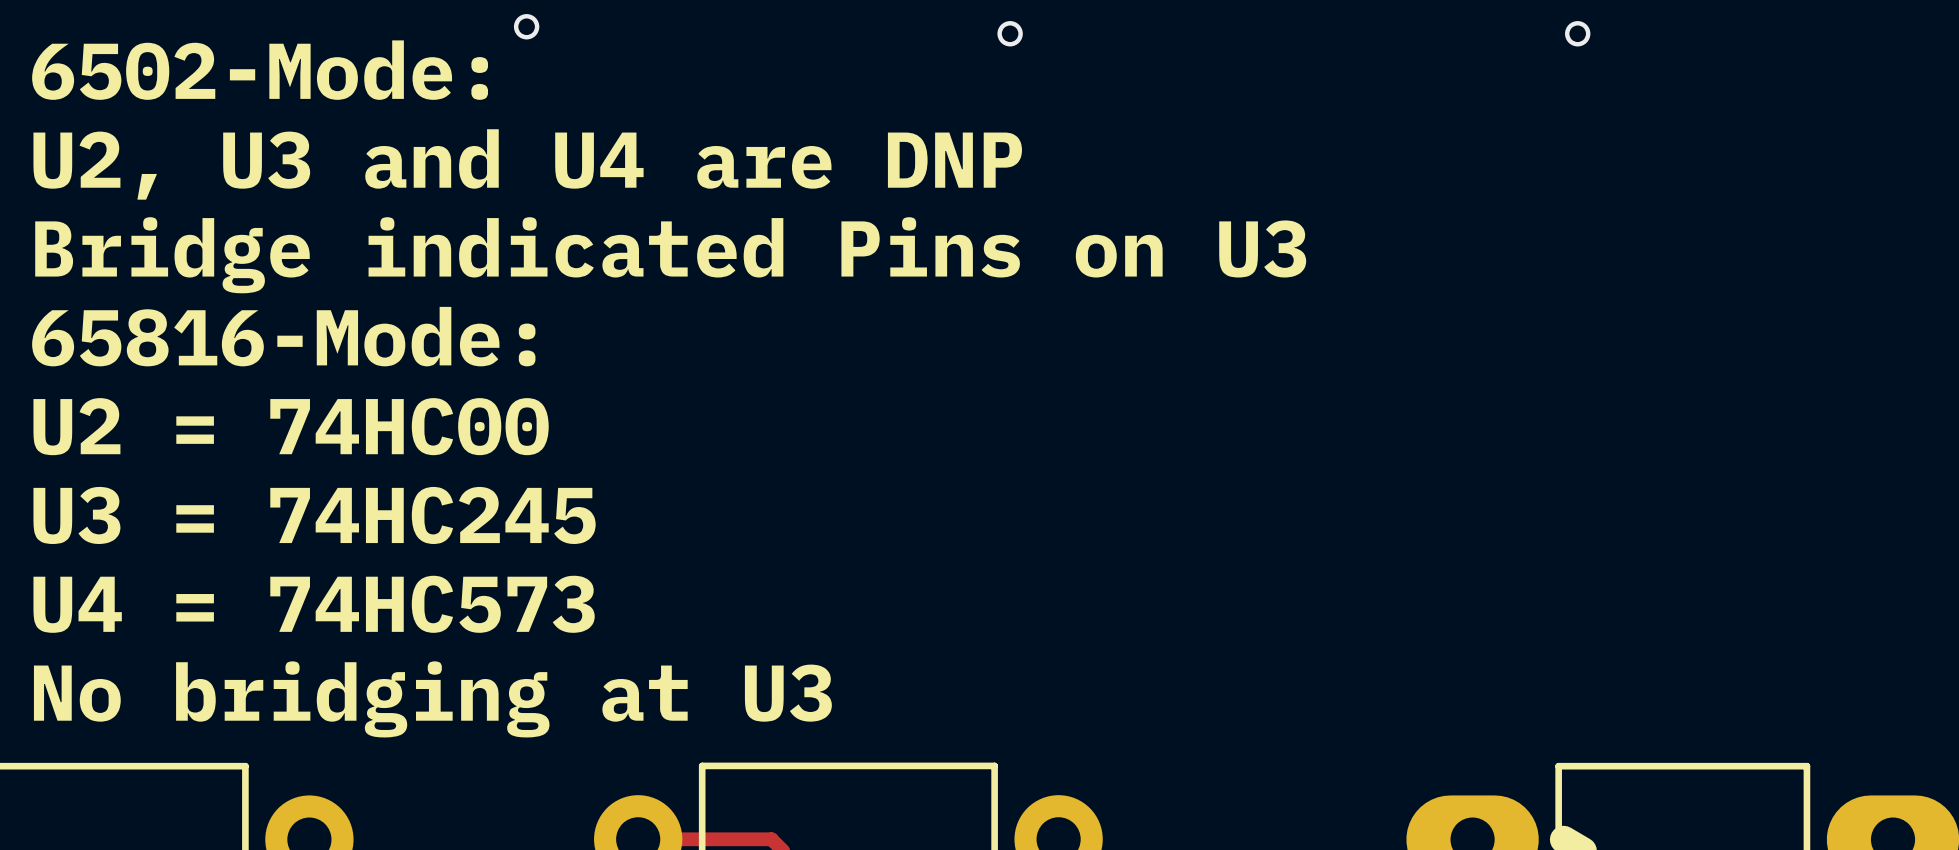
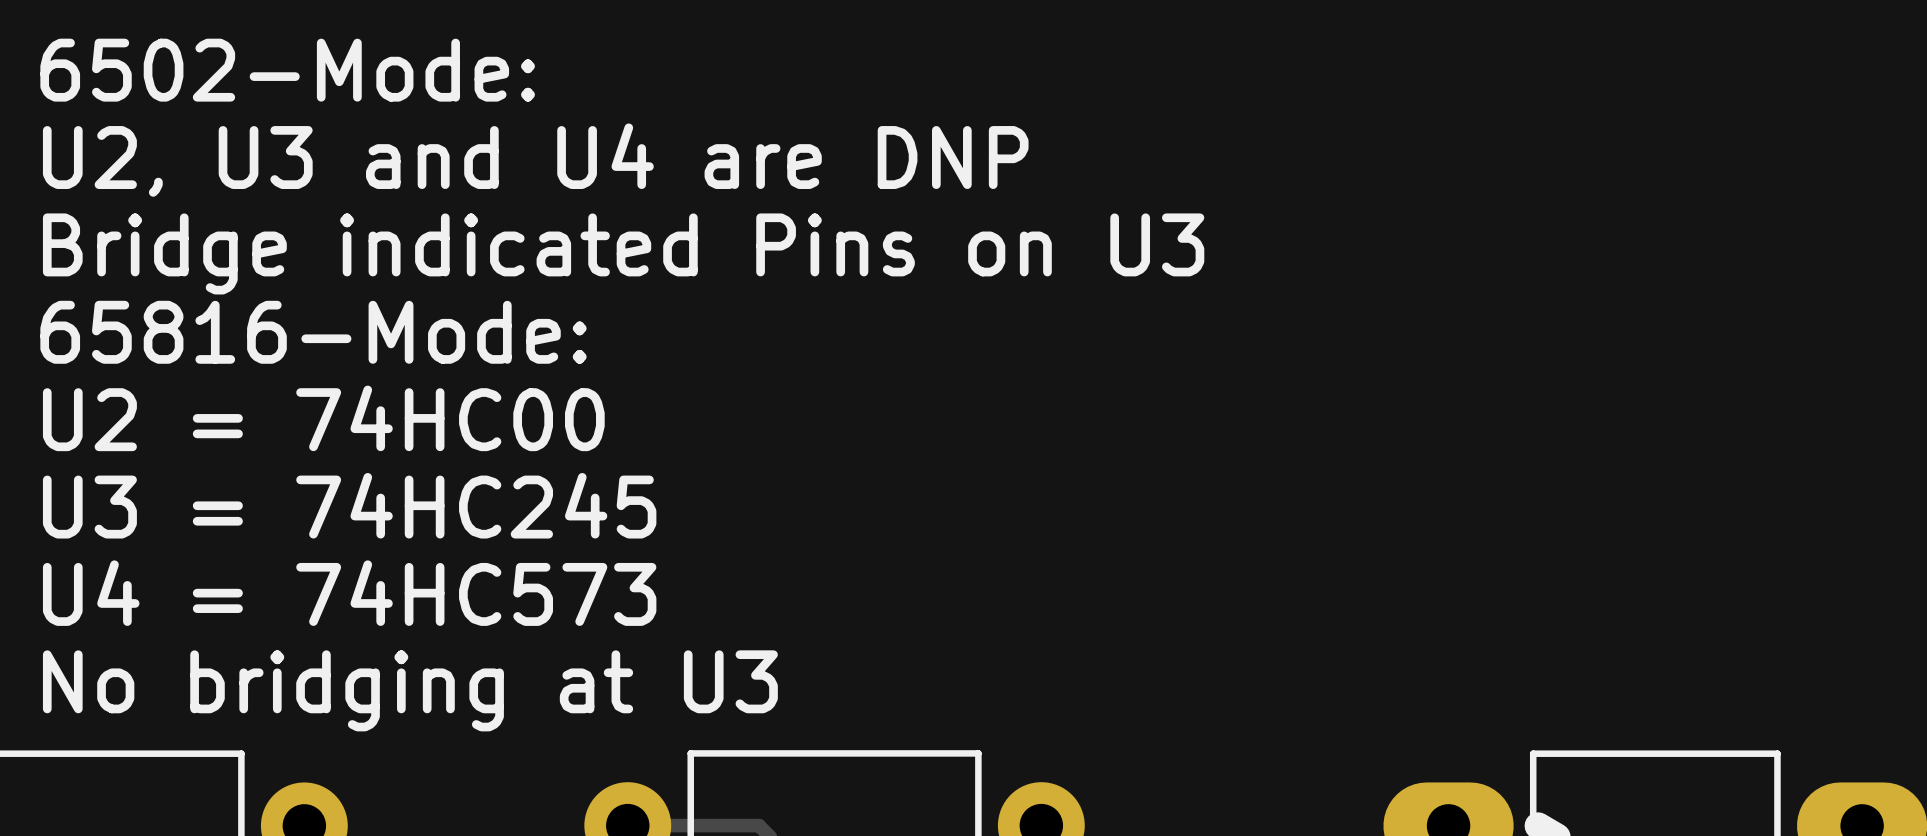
via: (526, 26) -> none
via: (1010, 33) -> none
via: (1577, 33) -> none

